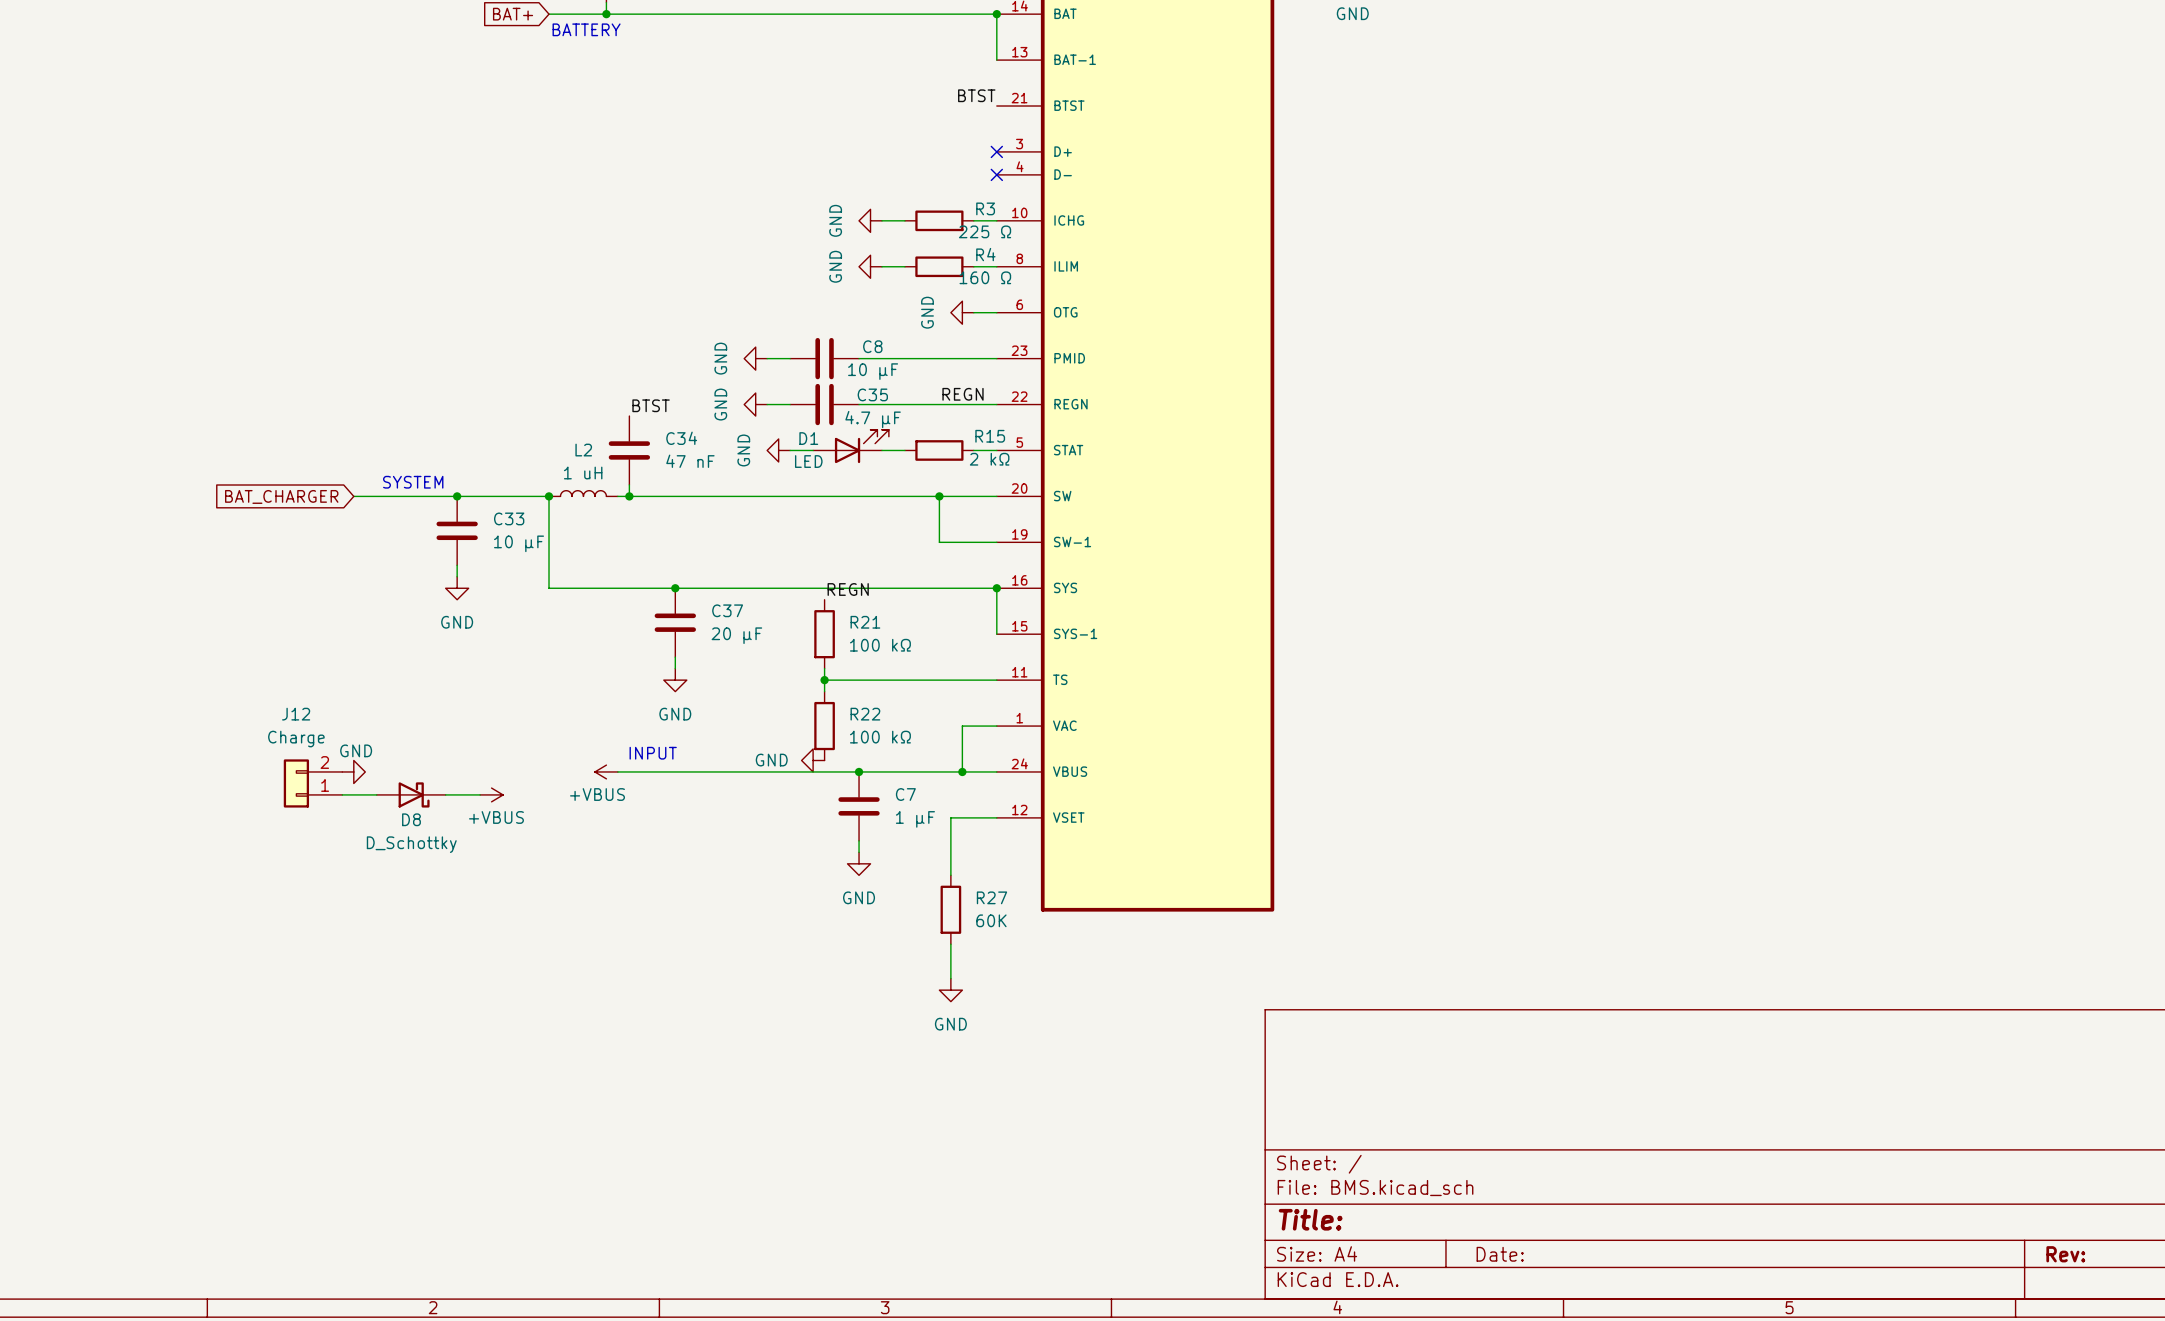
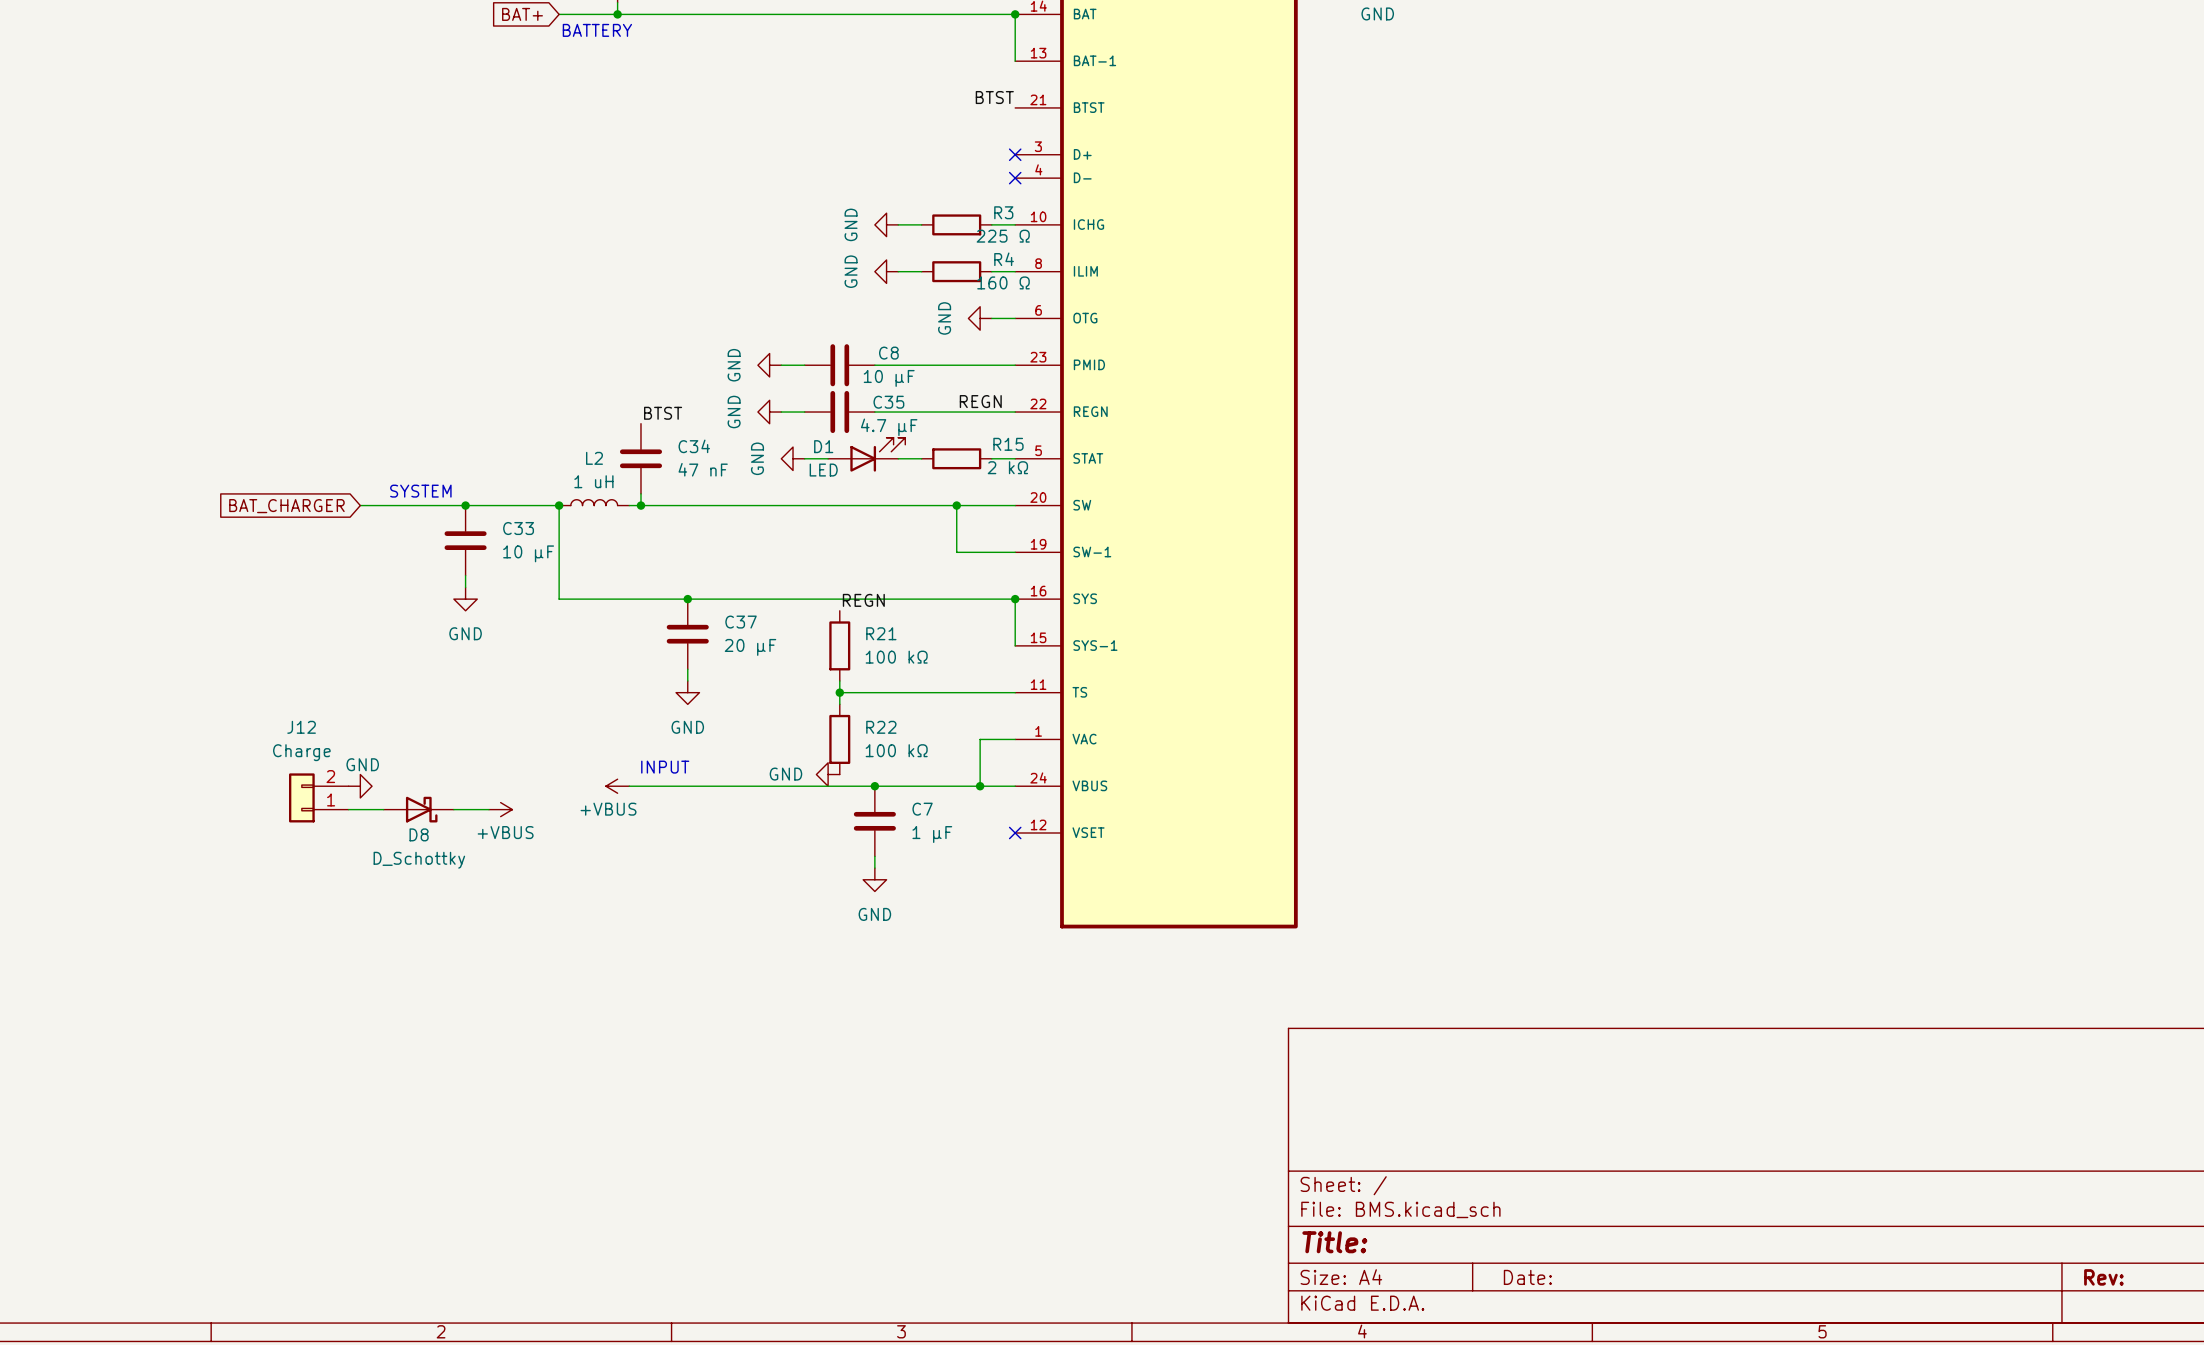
wire: (996, 817) (950, 817) (950, 875) -> none
no-connect mark: none -> (1015, 833)
R27: 60K (950, 909) -> none
wire: (950, 944) (950, 978) -> none
power symbol: GND (950, 990) -> none

